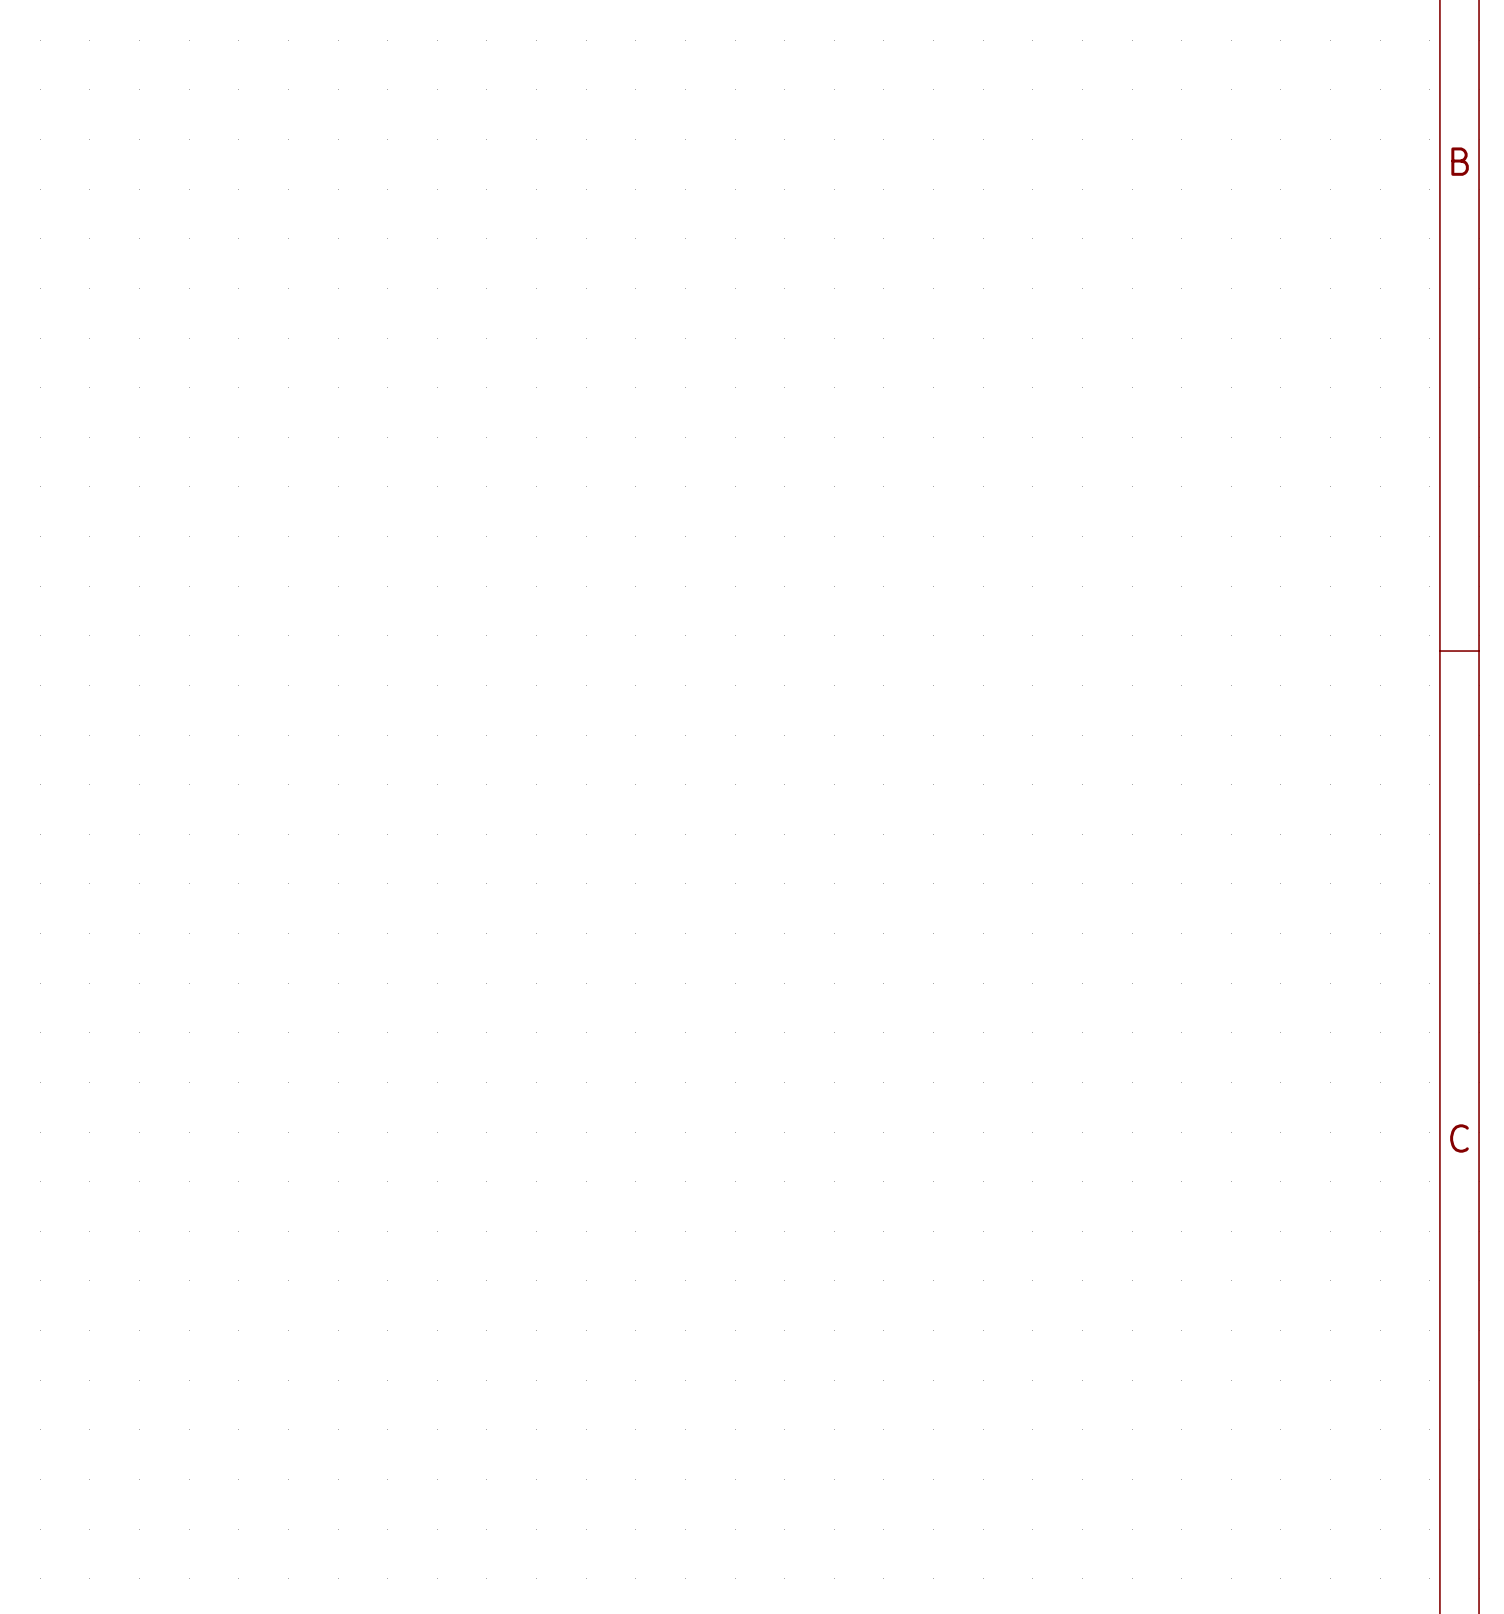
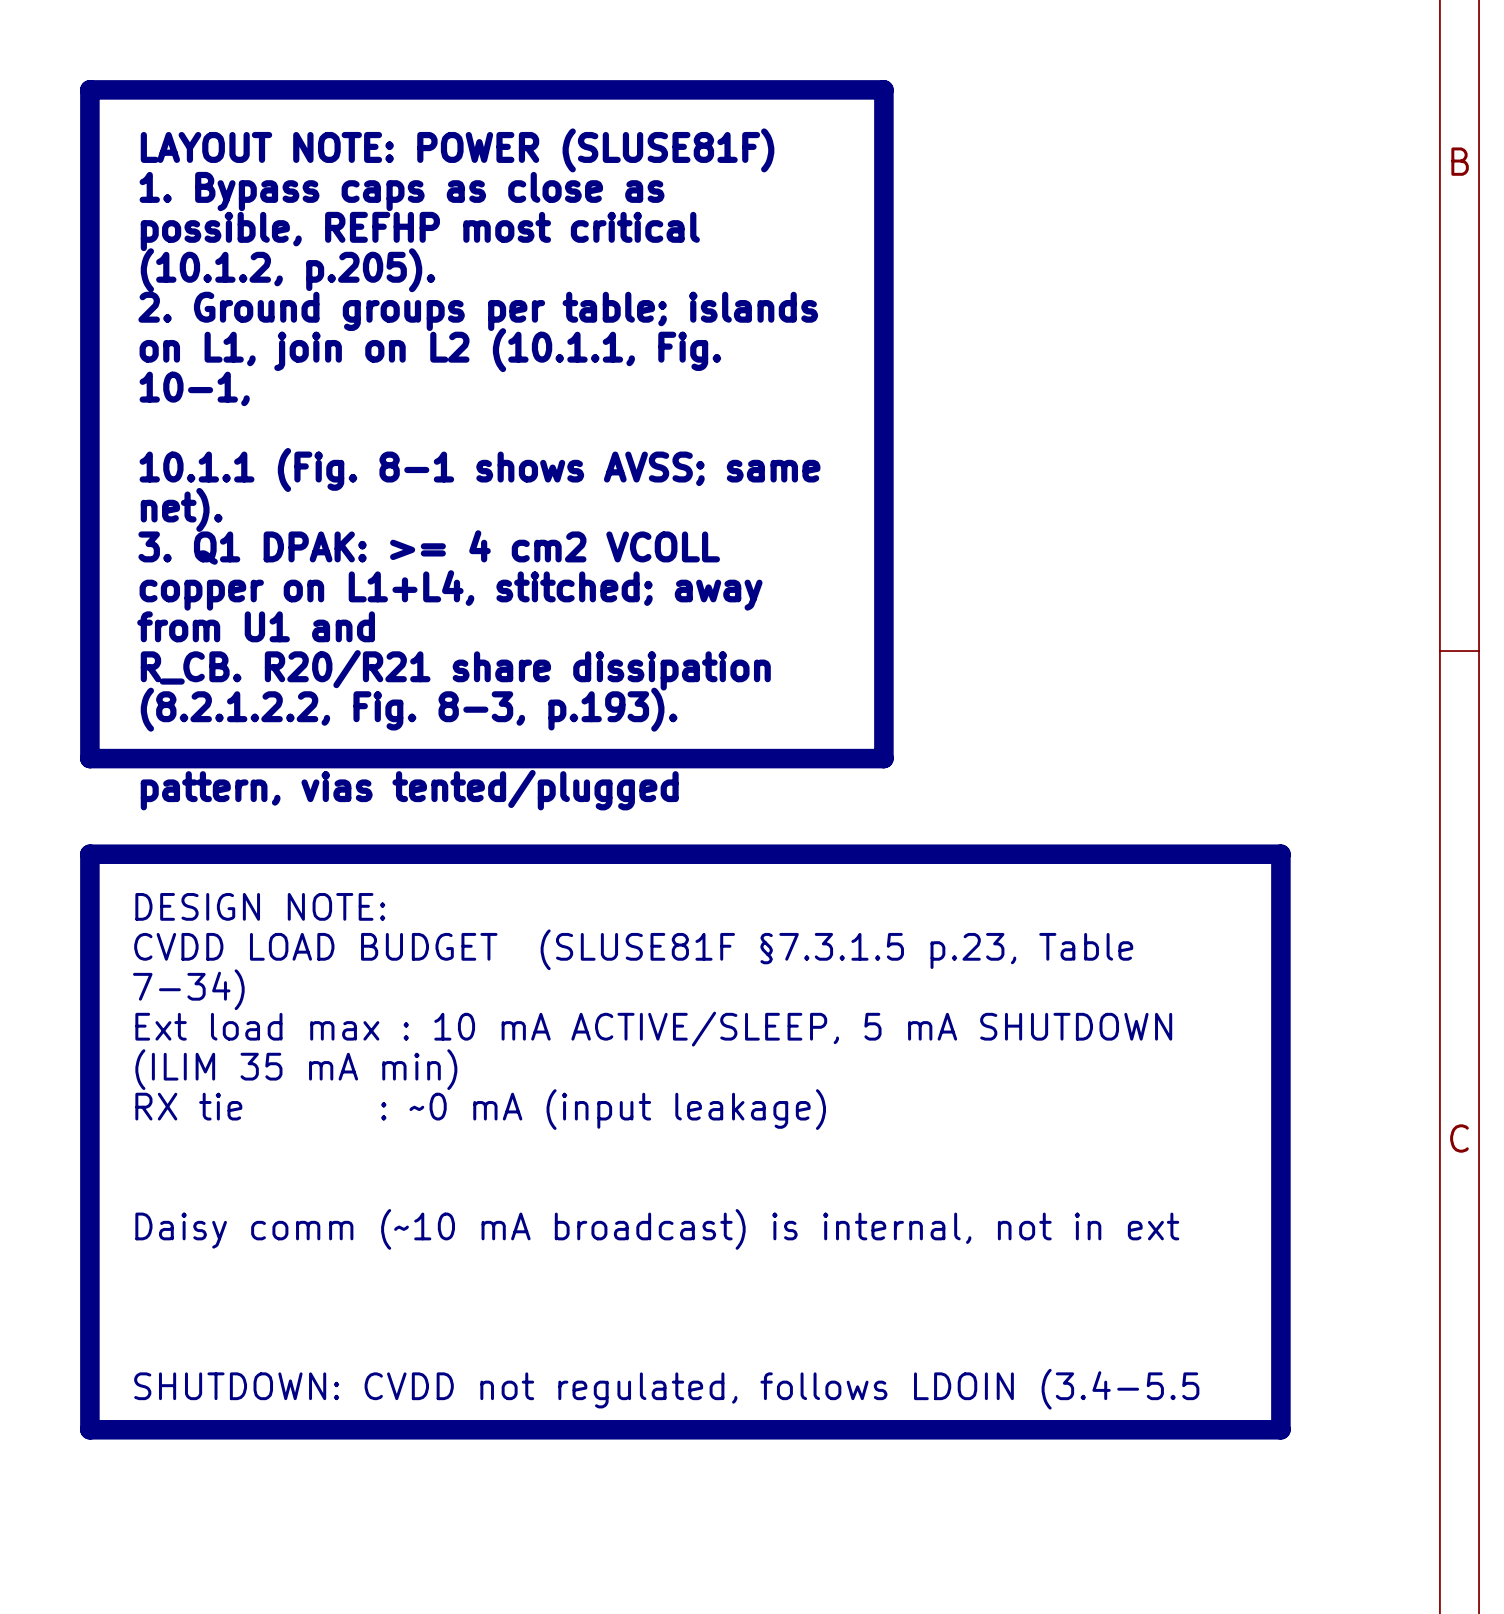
line: none -> (89, 89) (883, 89) (883, 758) (89, 758) (89, 89)
text: none -> LAYOUT NOTE: POWER (SLUSE81F) (457, 150)
text: none -> 1. Bypass caps as close as (402, 191)
text: none -> possible, REFHP most critical (420, 231)
text: none -> (10.1.2, p.205). (287, 270)
text: none -> 2. Ground groups per table; islands (478, 311)
text: none -> on L1, join on L2 (10.1.1, Fig. (430, 350)
text: none -> 10-1, (194, 388)
text: none -> 10.1.1 (Fig. 8-1 shows AVSS; same (480, 469)
text: none -> net). (181, 509)
text: none -> 3. Q1 DPAK: >= 4 cm2 VCOLL (429, 547)
text: none -> copper on L1+L4, stitched; away (451, 590)
text: none -> from U1 and (256, 626)
text: none -> R_CB. R20/R21 share dissipation (455, 670)
text: none -> (8.2.1.2.2, Fig. 8-3, p.193). (409, 709)
text: none -> pattern, vias tented/plugged (409, 790)
line: none -> (89, 854) (89, 1429) (1280, 1429) (1280, 854) (89, 854)
text: none -> DESIGN NOTE: (260, 906)
text: none -> CVDD LOAD BUDGET (SLUSE81F §7.3.1.5 p.23, Table (633, 949)
text: none -> 7-34) (188, 989)
text: none -> Ext load max : 10 mA ACTIVE/SLEEP, 5 mA SHUTDOWN (653, 1029)
text: none -> (ILIM 35 mA min) (296, 1069)
text: none -> RX tie : ~0 mA (input leakage) (480, 1109)
text: none -> Daisy comm (~10 mA broadcast) is internal, not in ext (657, 1229)
text: none -> SHUTDOWN: CVDD not regulated, follows LDOIN (3.4-5.5 (666, 1389)

